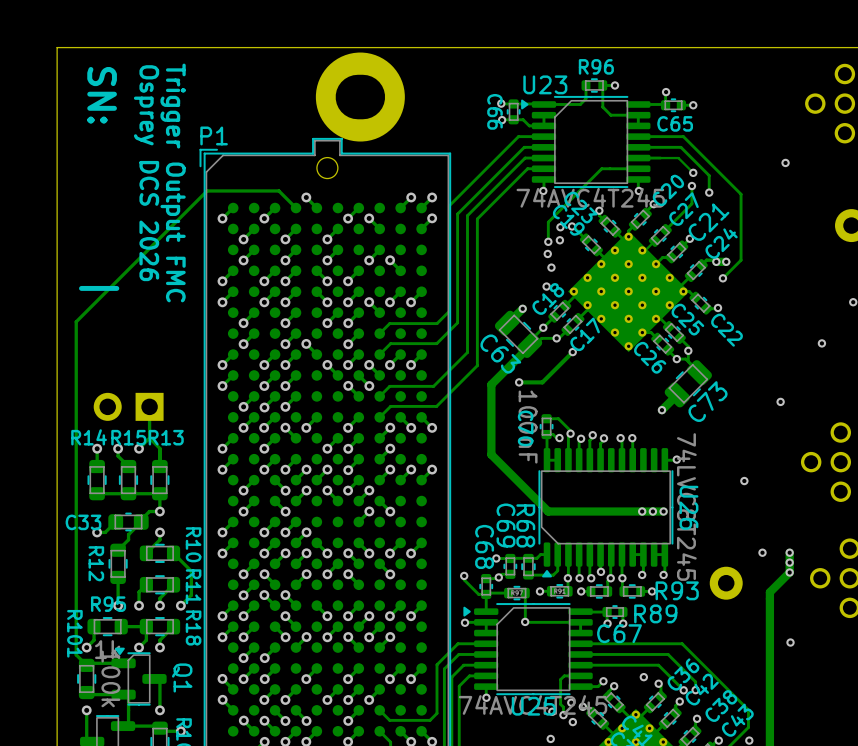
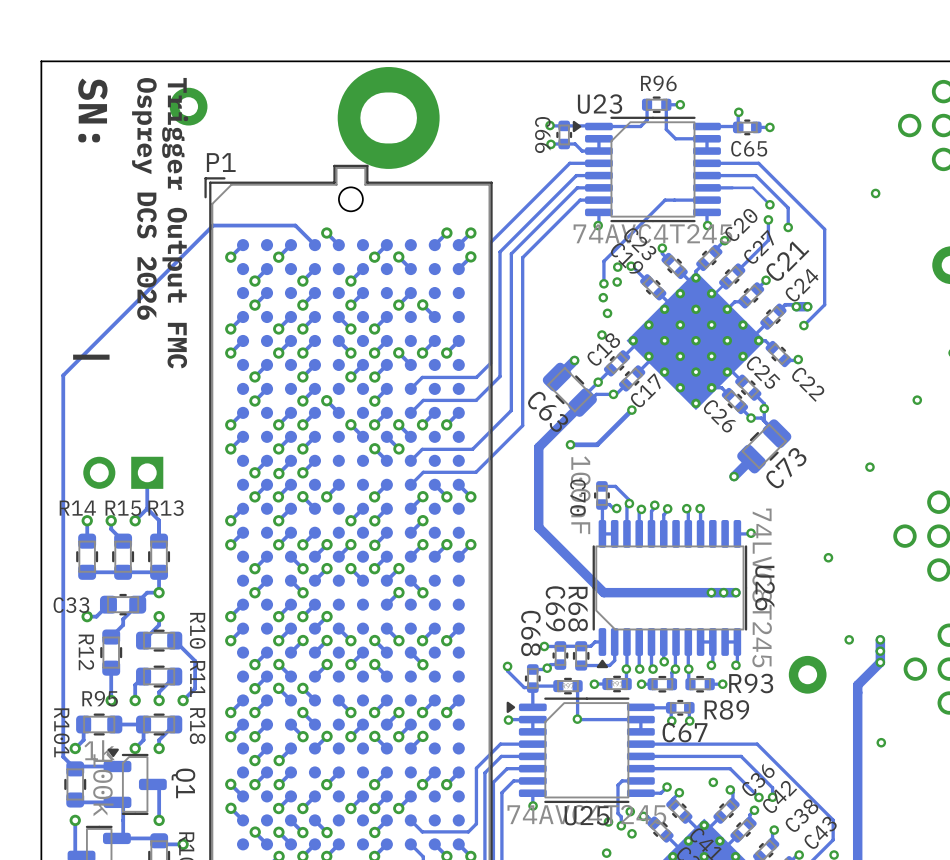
part: none -> (188, 106)

